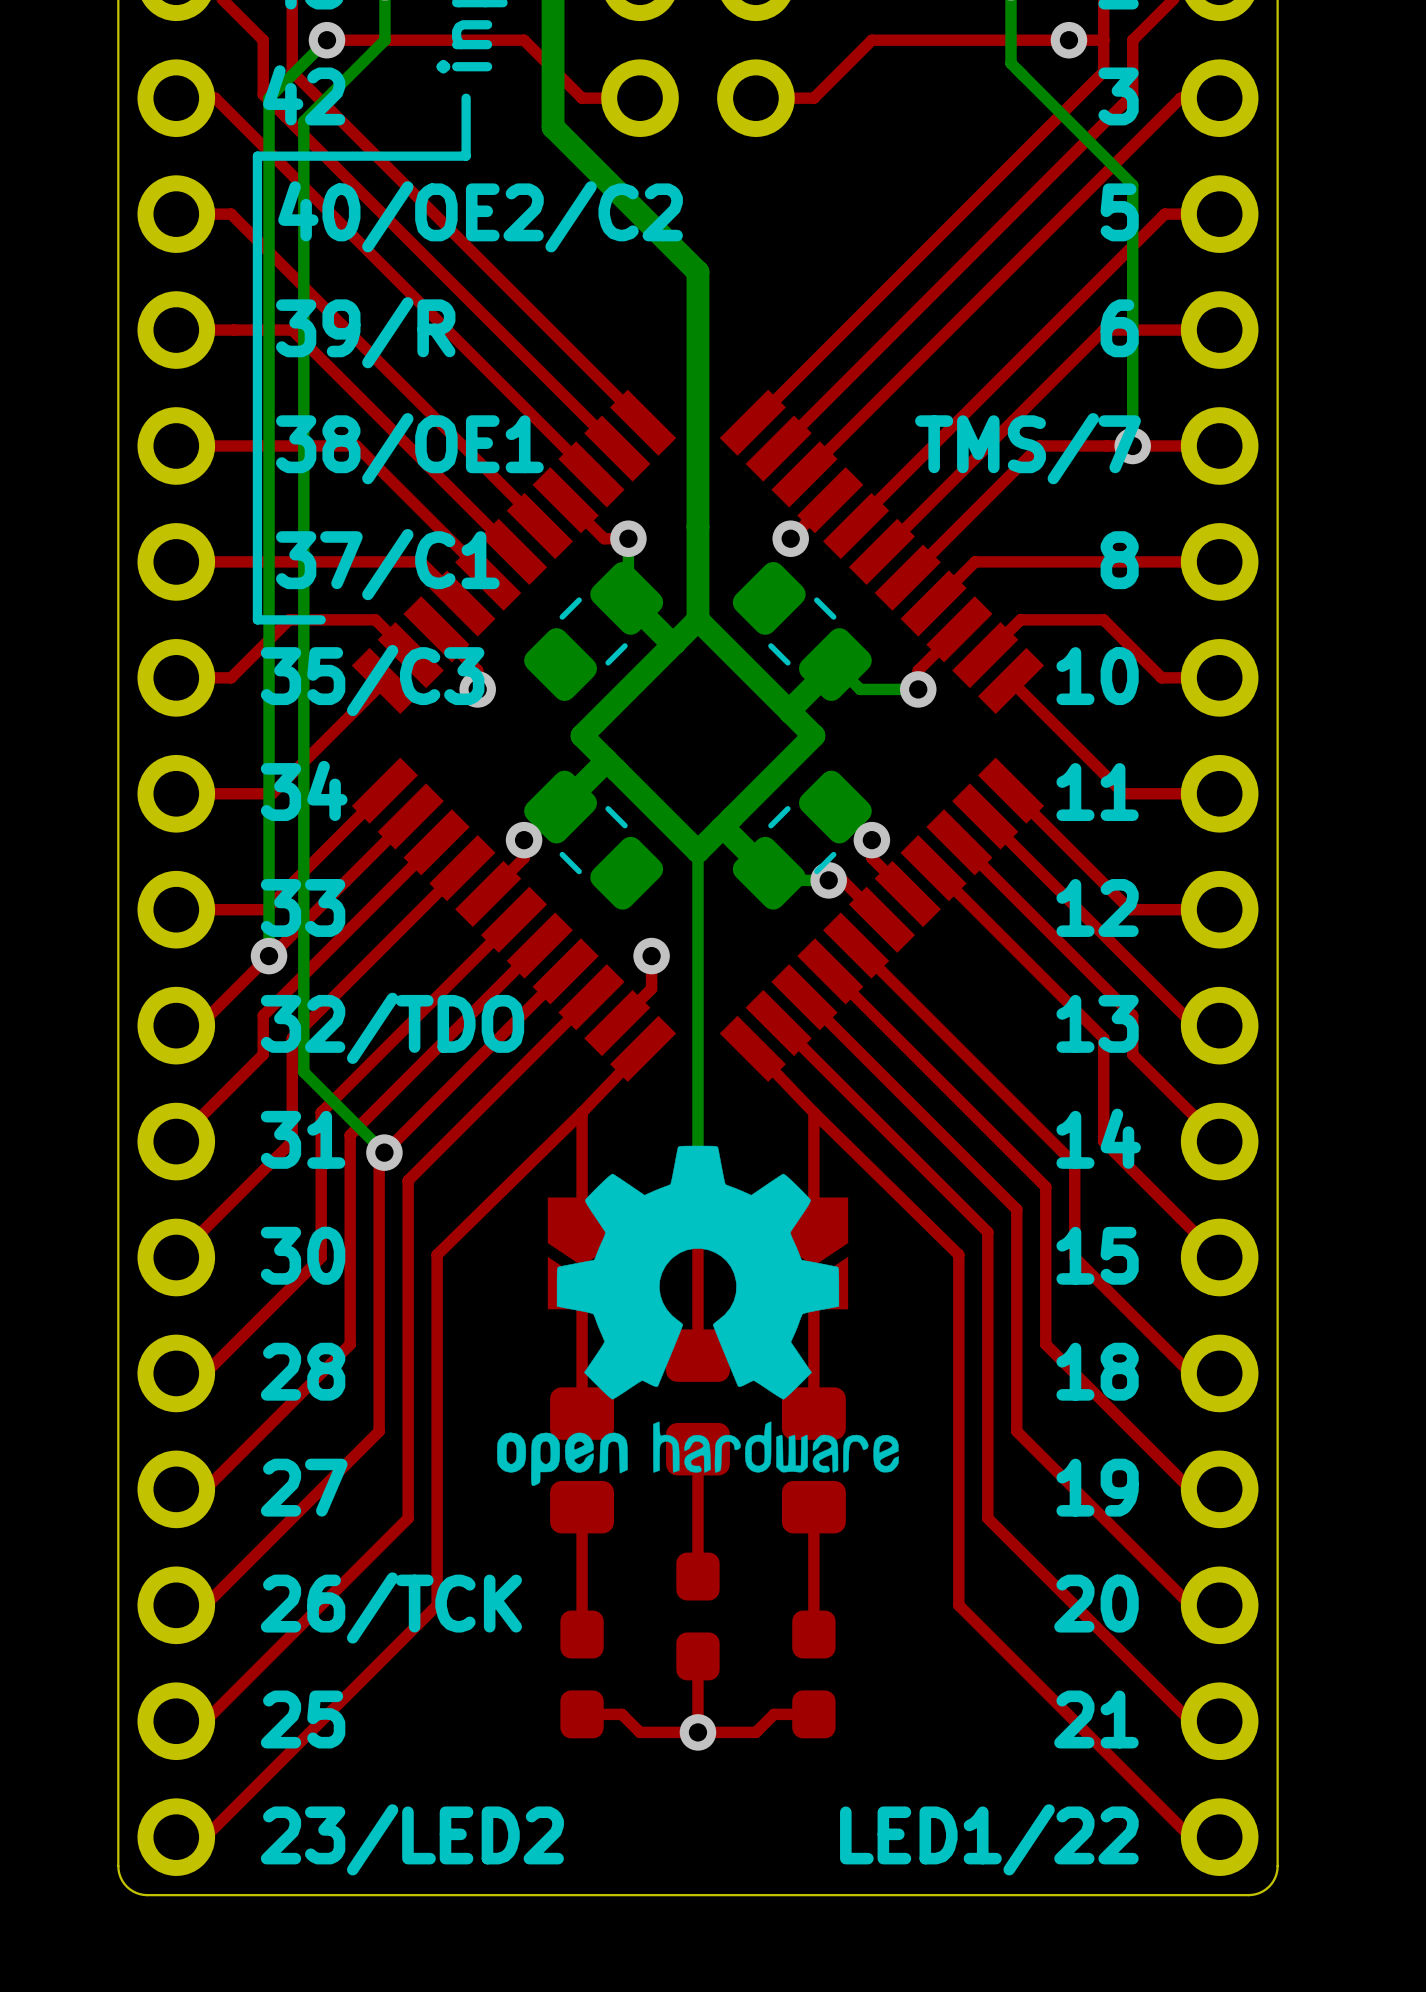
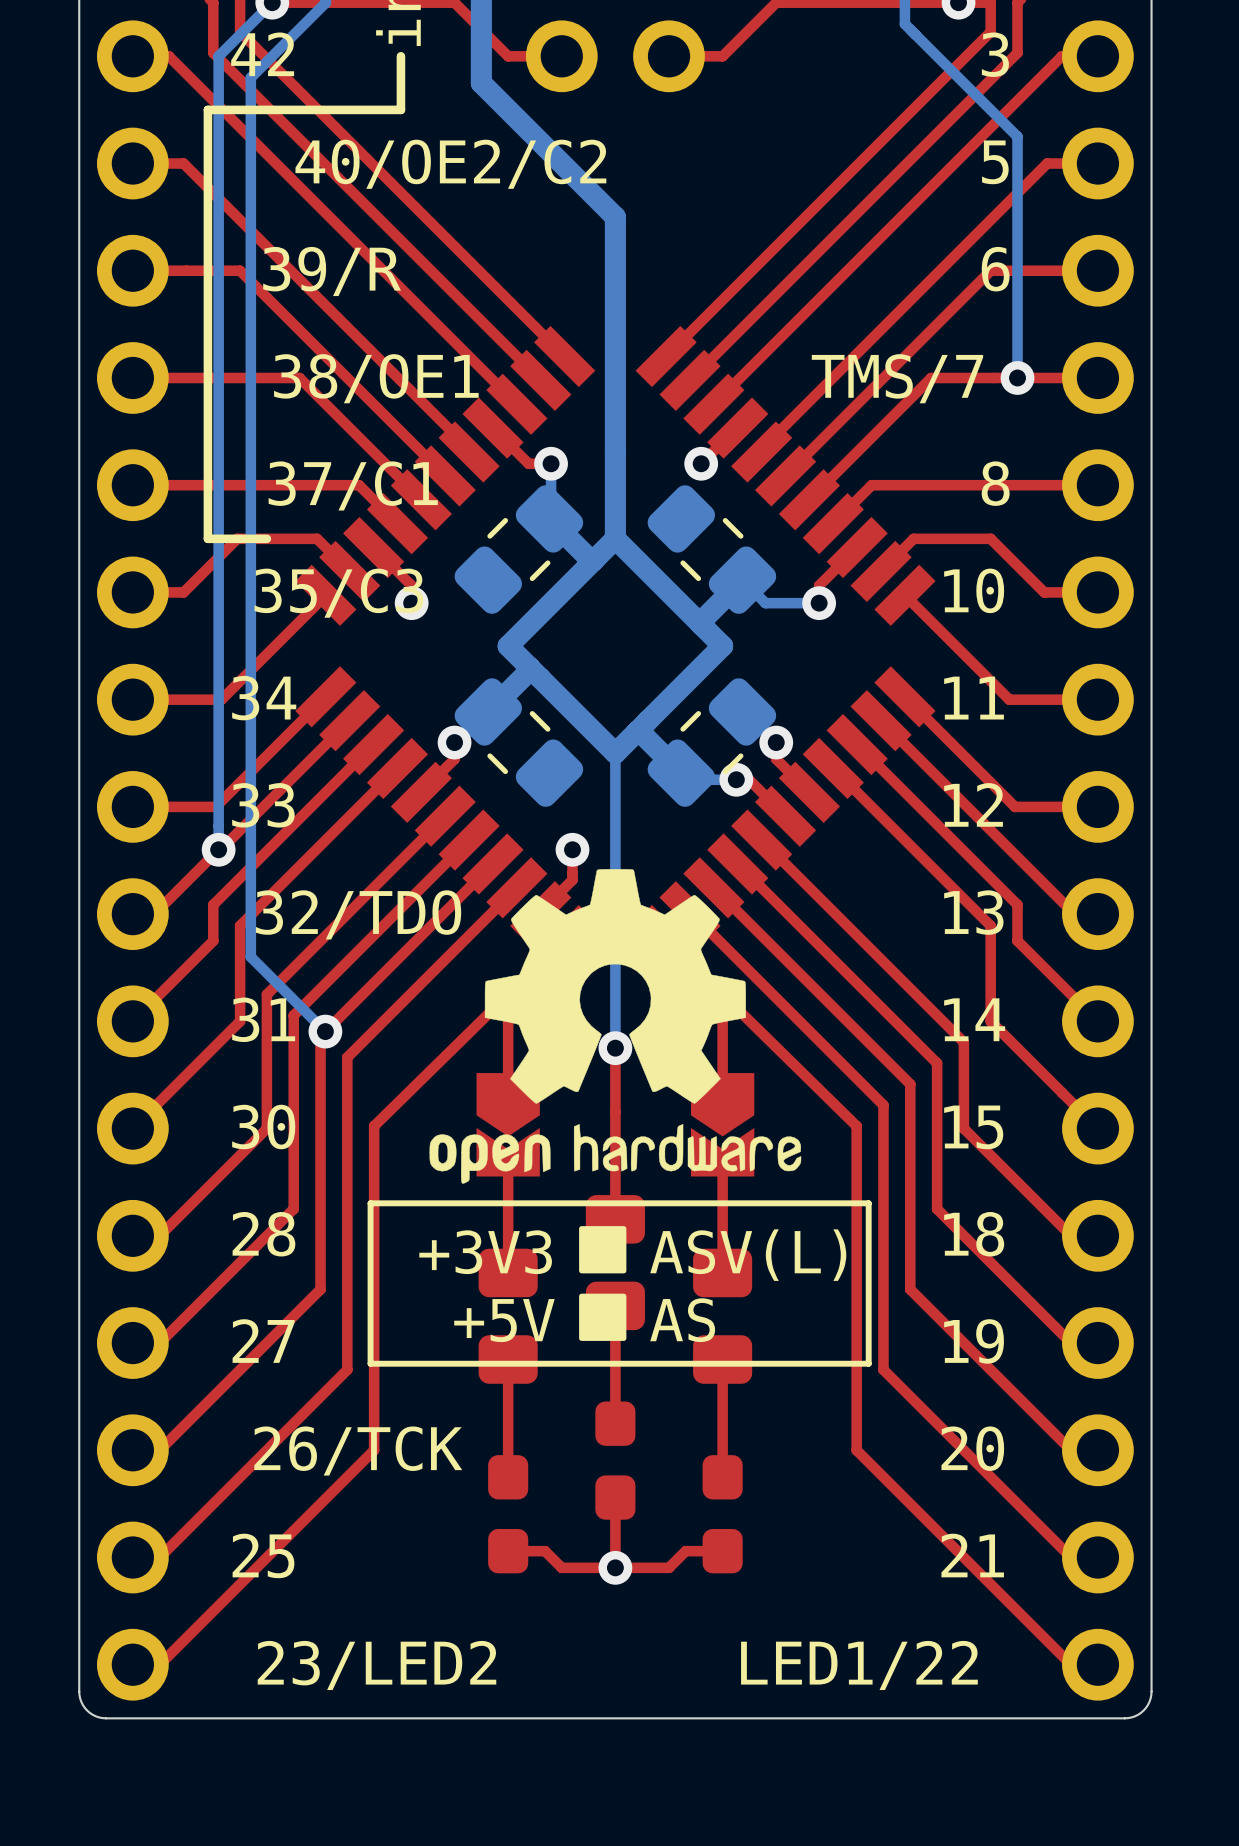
drawing position: (697, 1315) -> (615, 1026)
line: none -> (868, 1203) (370, 1203) (370, 1363) (868, 1363) (868, 1203)
drawing: none -> [579, 1226, 627, 1341]
text: none -> +3V3 (485, 1252)
text: none -> ASV(L) (748, 1255)
text: none -> +5V (504, 1320)
text: none -> AS (682, 1320)

